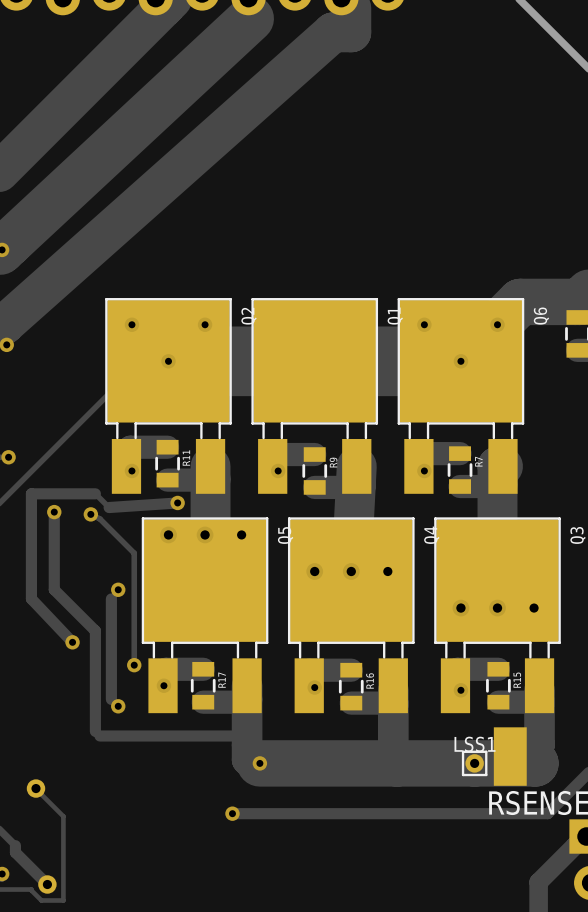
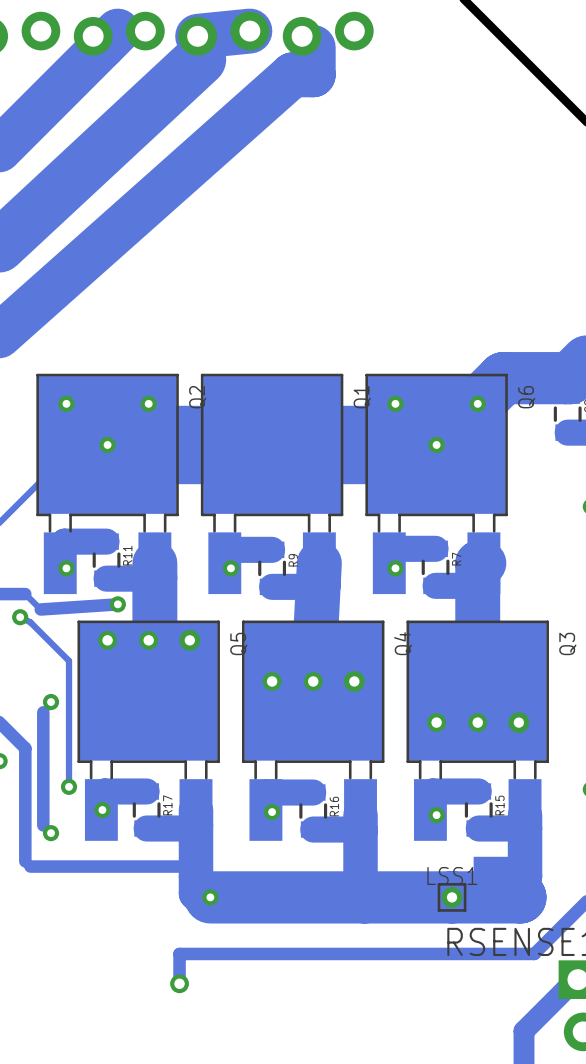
track: none -> (179, 953) (179, 983)
via: (232, 813) -> none
via: none -> (179, 983)

